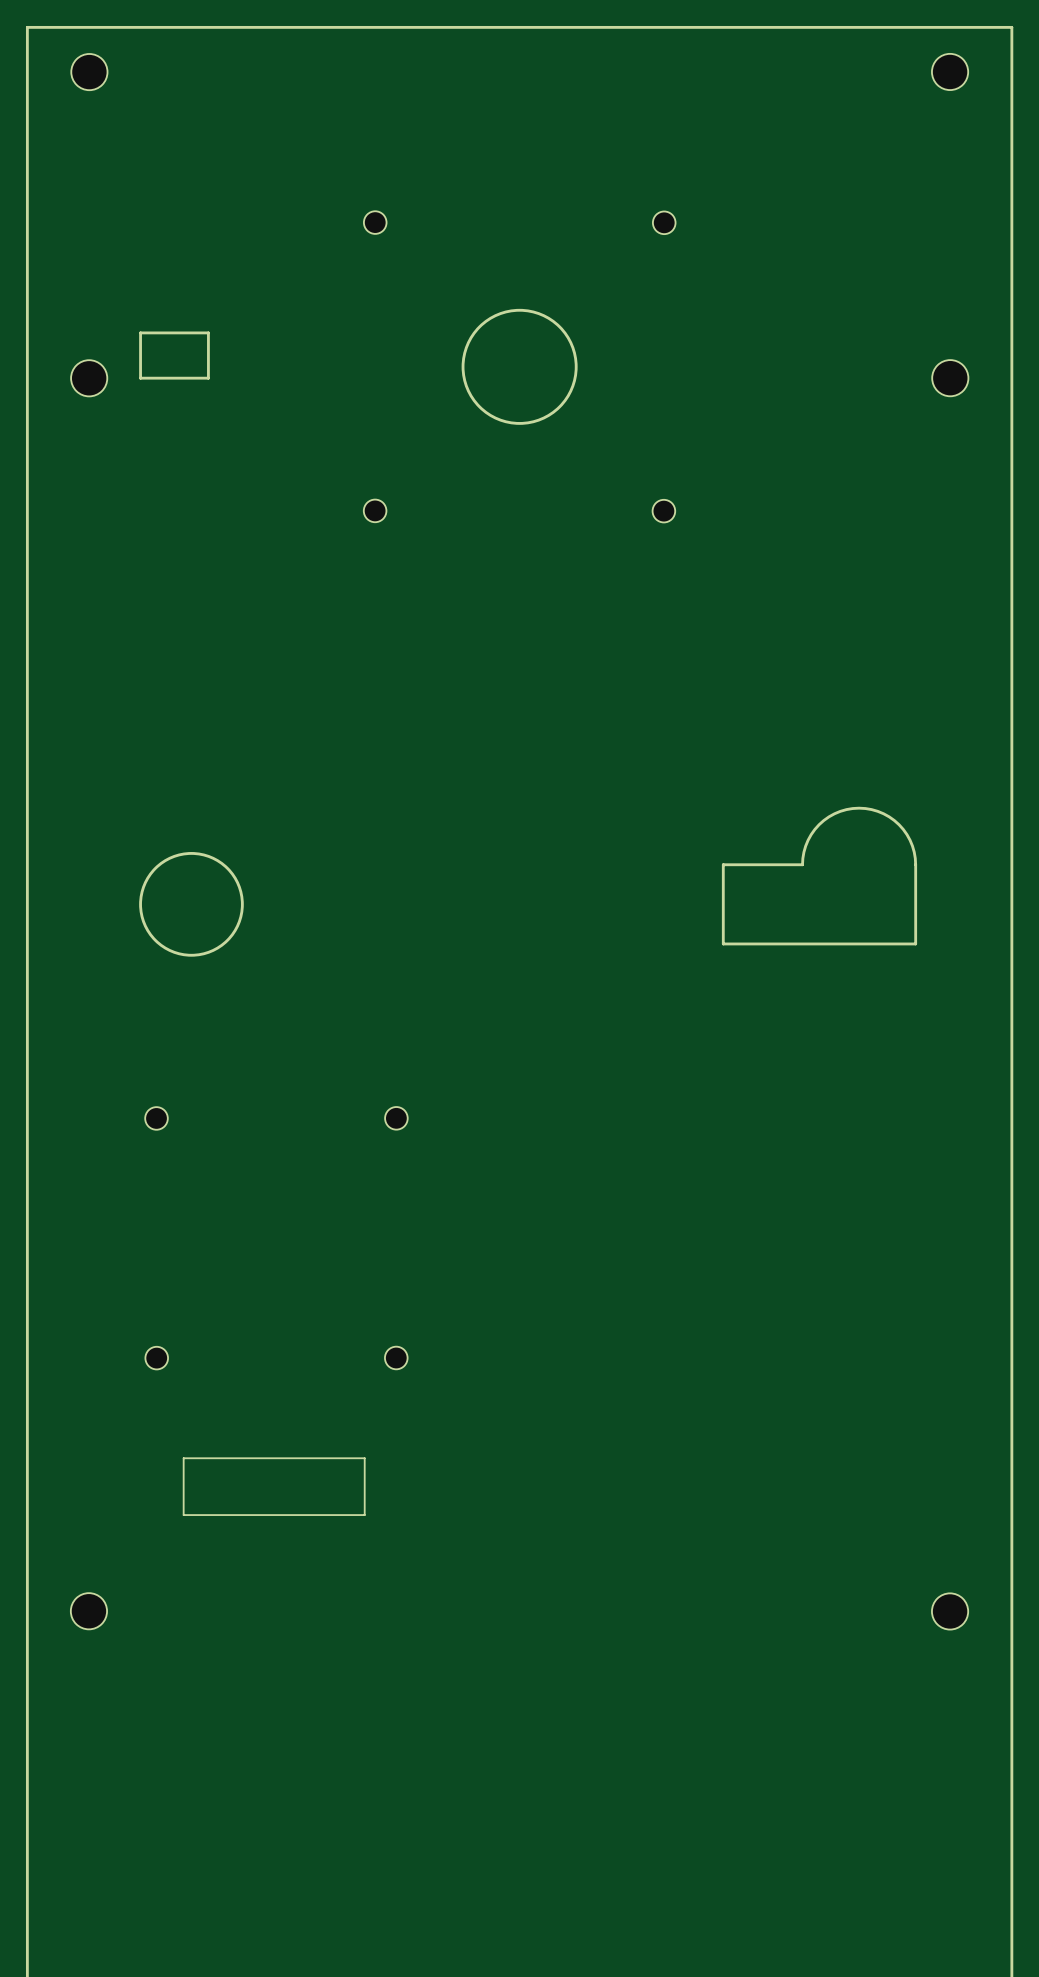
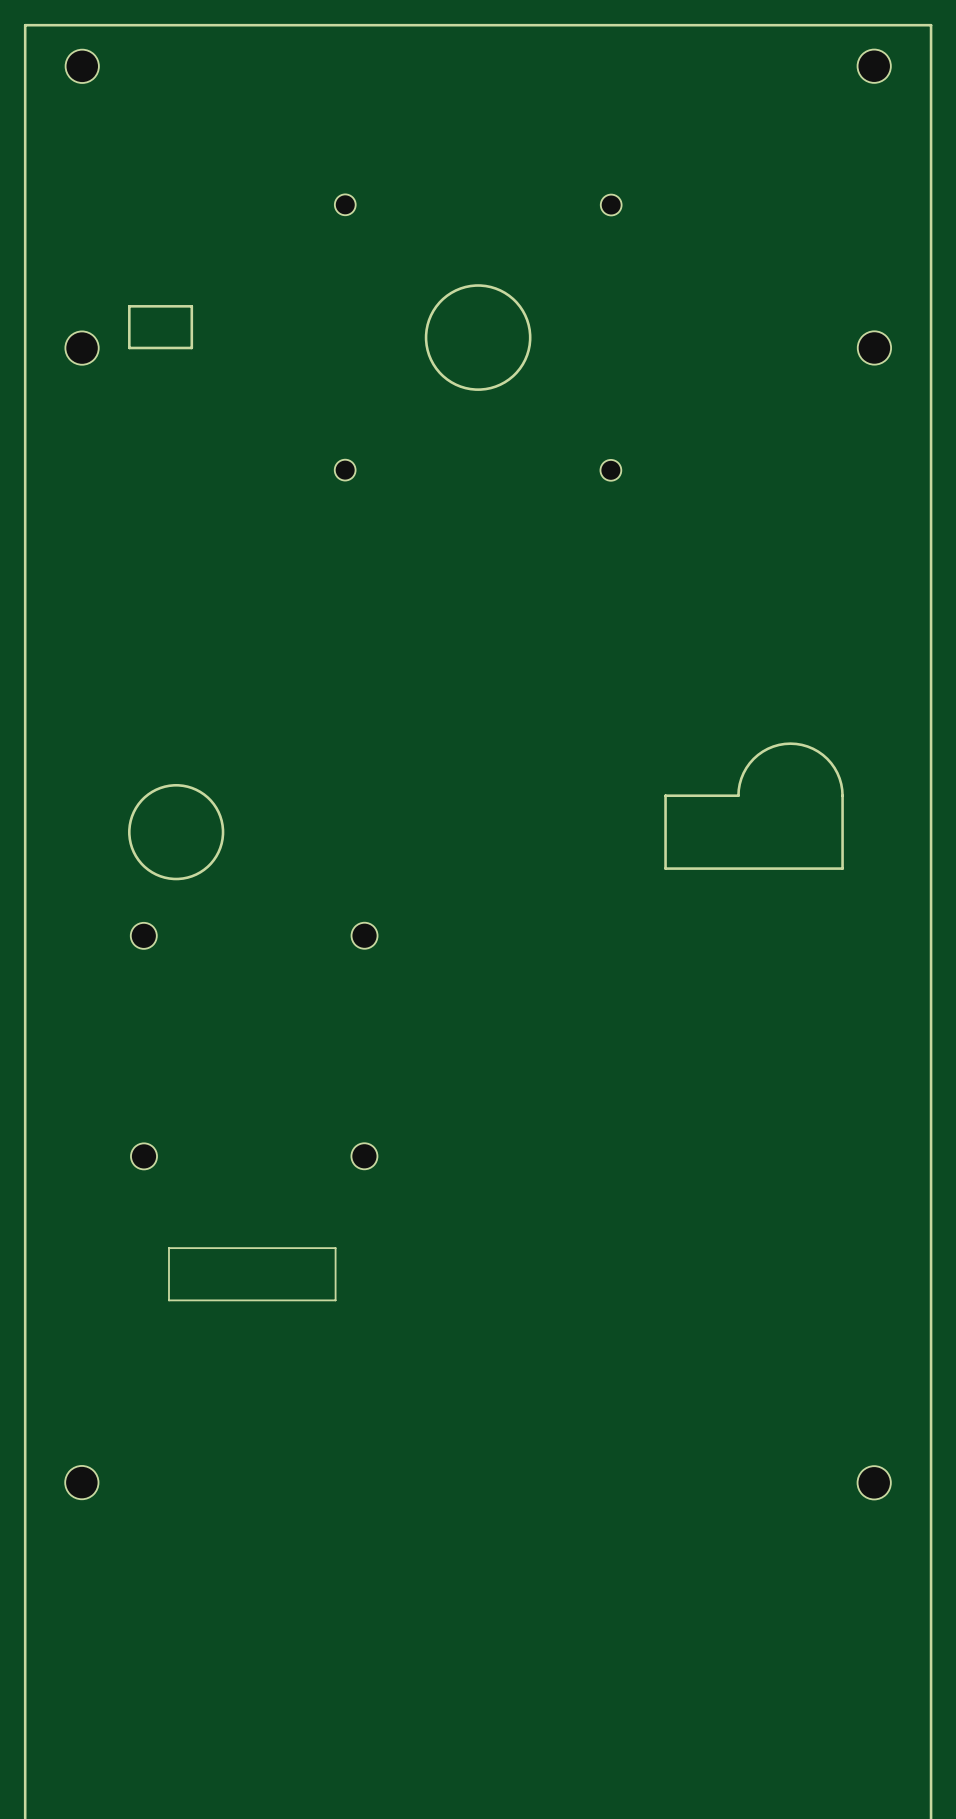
part: none -> (364, 935)
part: none -> (143, 935)
part: (156, 1118) -> none
part: (396, 1118) -> none
part: none -> (144, 1156)
part: none -> (364, 1156)
part: (156, 1358) -> none
part: (396, 1358) -> none
board edge: (364, 1458) (183, 1458) (183, 1515) (364, 1515) (364, 1458) -> (335, 1248) (168, 1248) (168, 1300) (335, 1300) (335, 1248)

